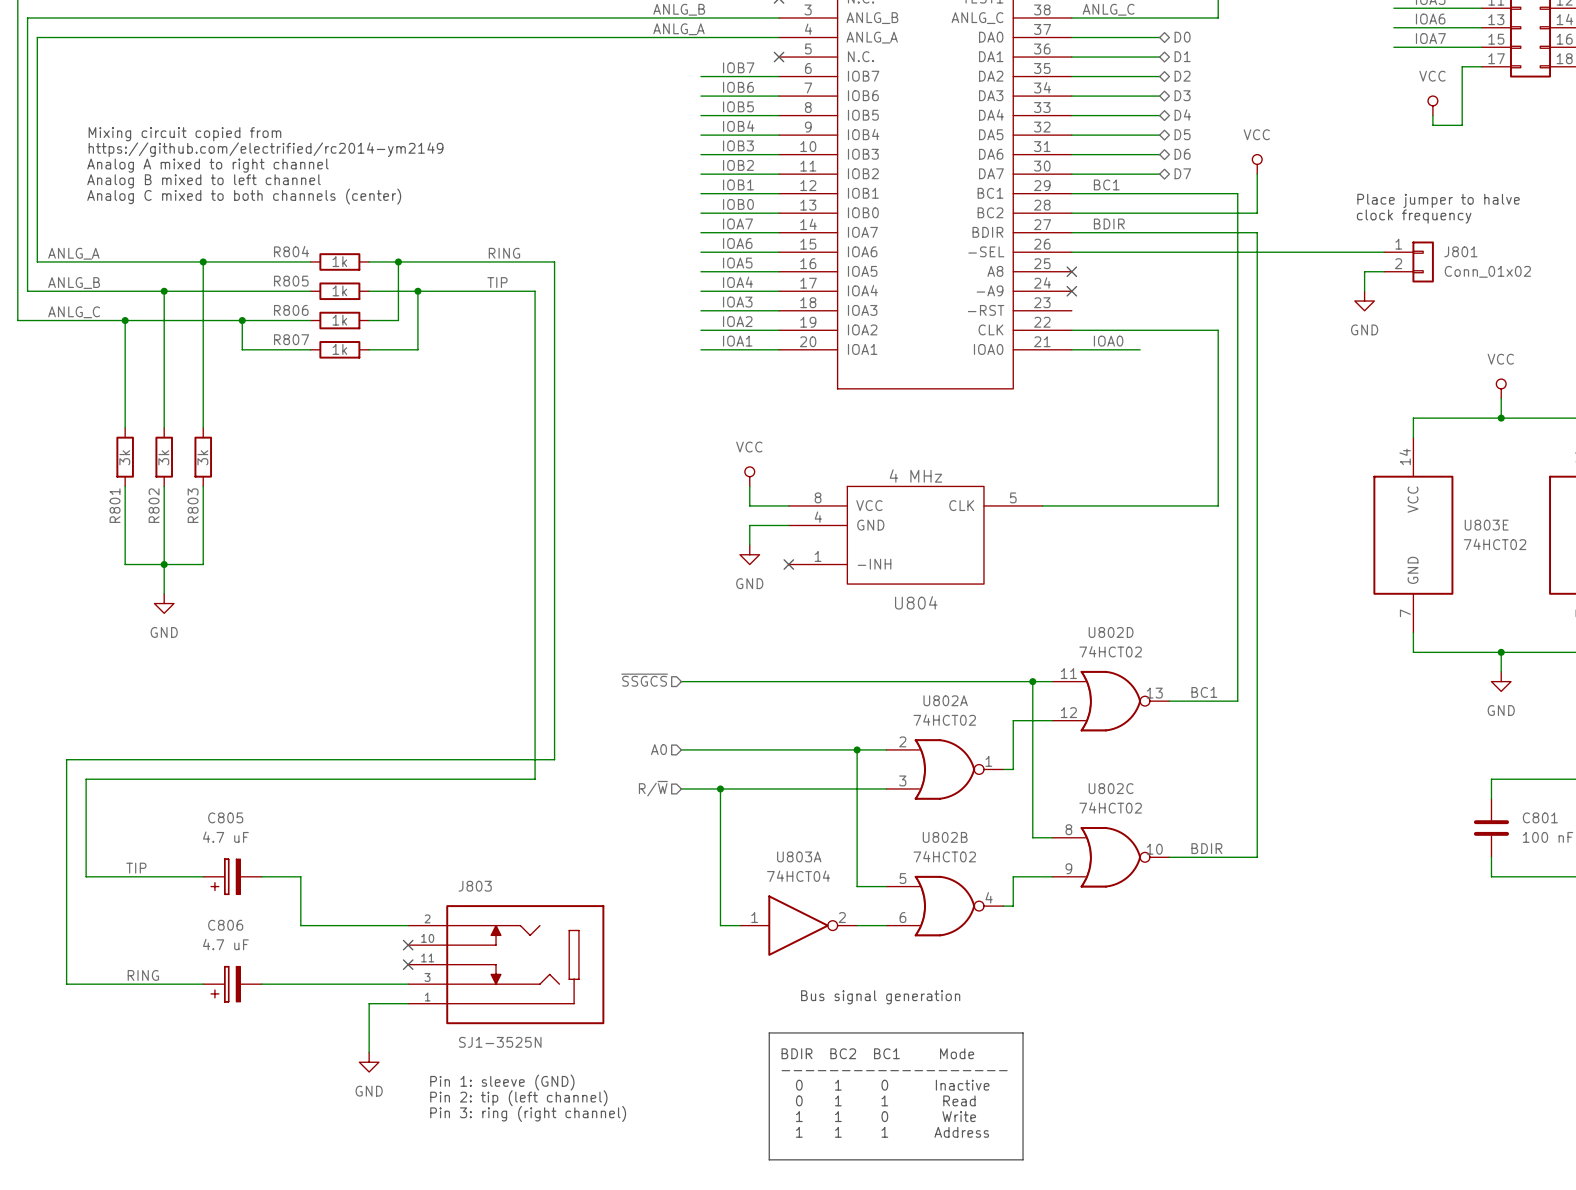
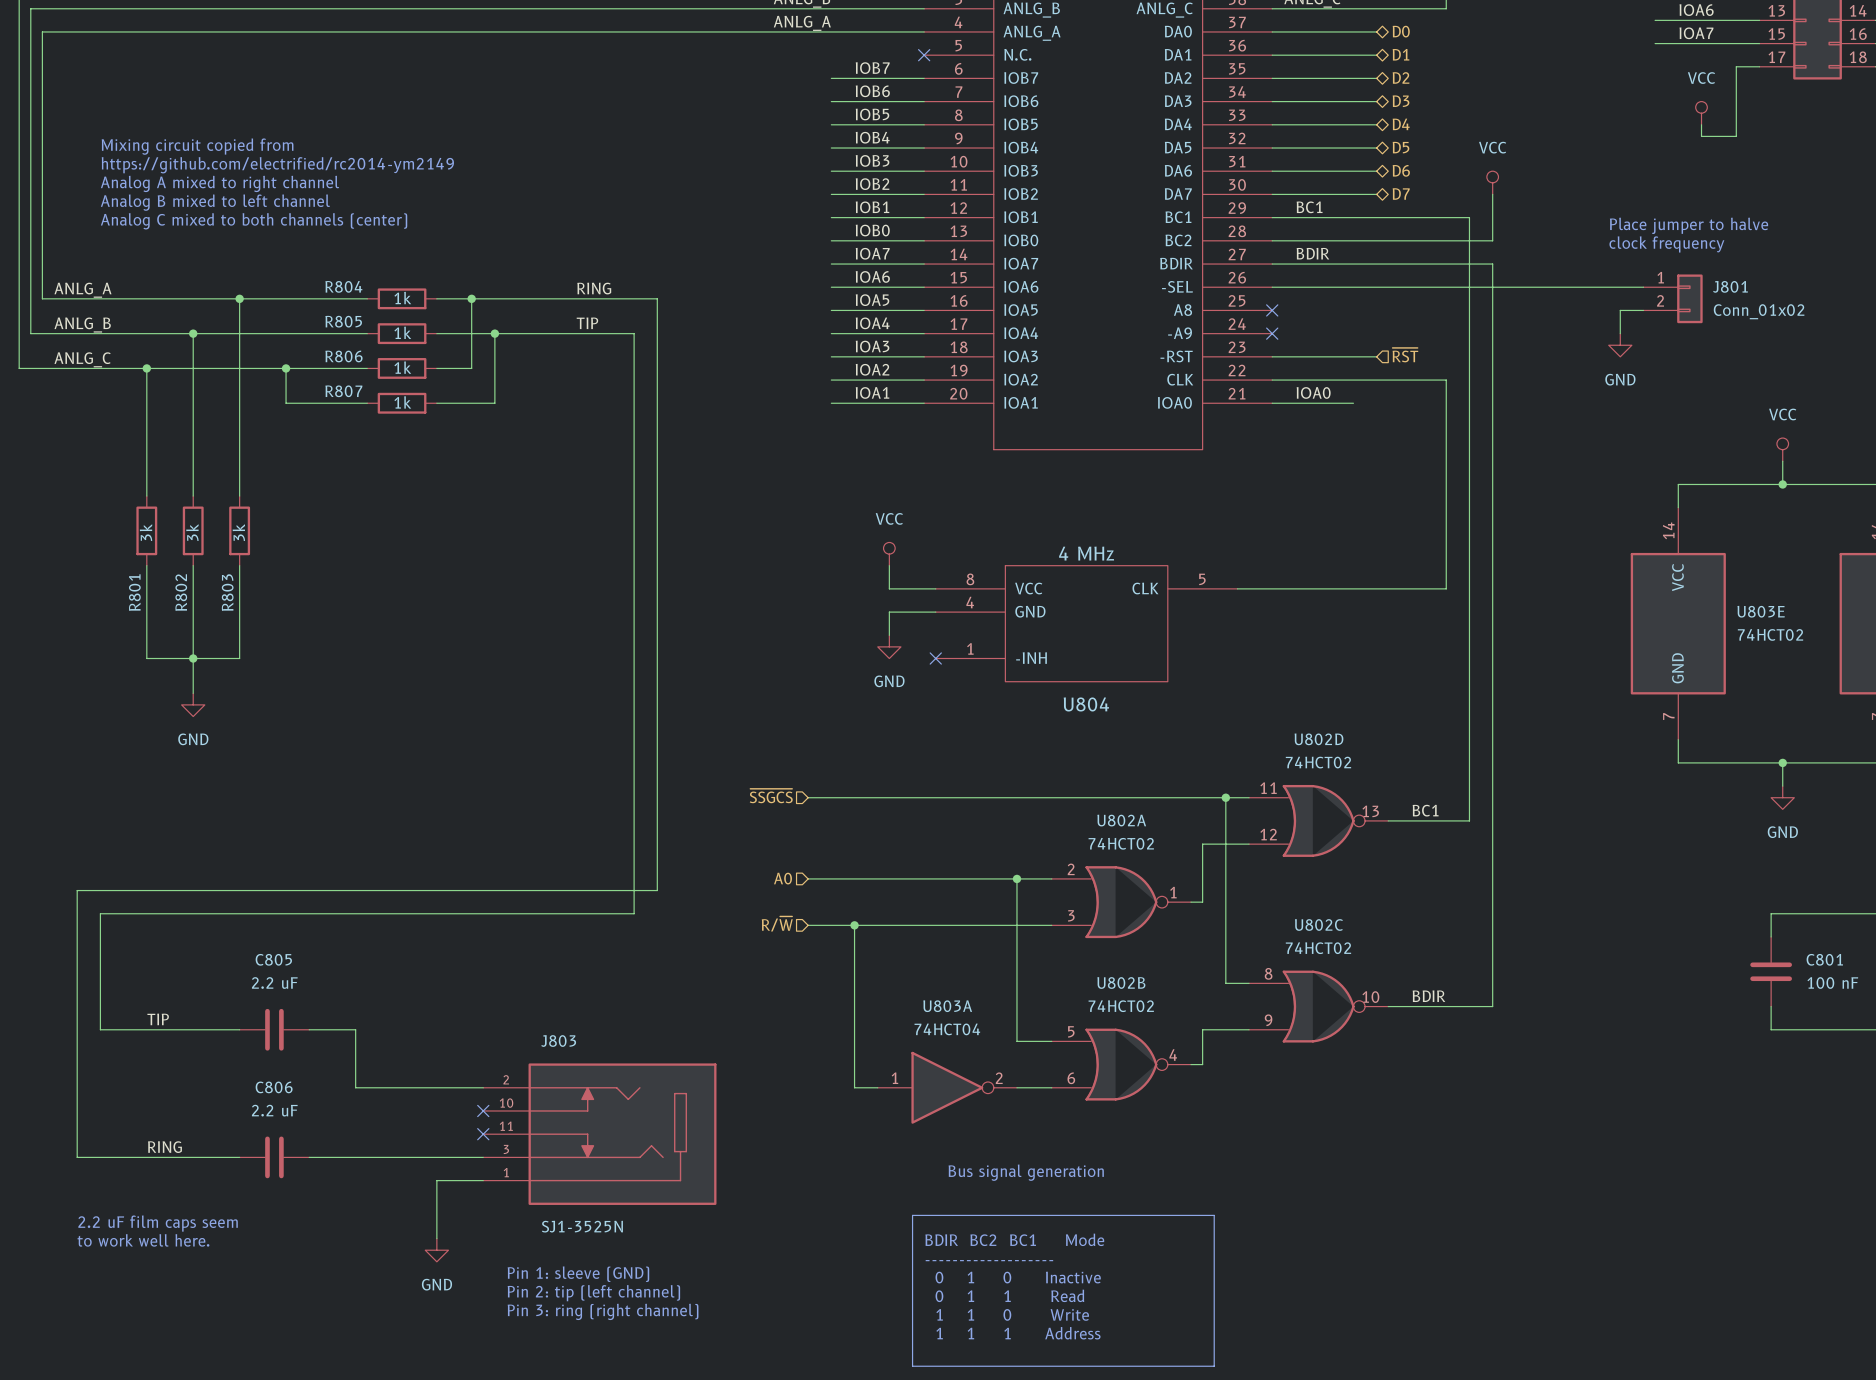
hierarchical label: none -> ~{RST} (1405, 355)
wire: none -> (1272, 356) (1376, 356)
C805 value: 4.7 uF (225, 837) -> 2.2 uF (274, 983)
C805 symbol: [203, 859, 262, 895] -> [239, 1008, 310, 1051]
C806 value: 4.7 uF (225, 944) -> 2.2 uF (274, 1110)
C806 symbol: [203, 966, 262, 1002] -> [239, 1136, 310, 1179]
text: none -> 2.2 uF film caps seem (158, 1223)
text: none -> to work well here. (143, 1240)

